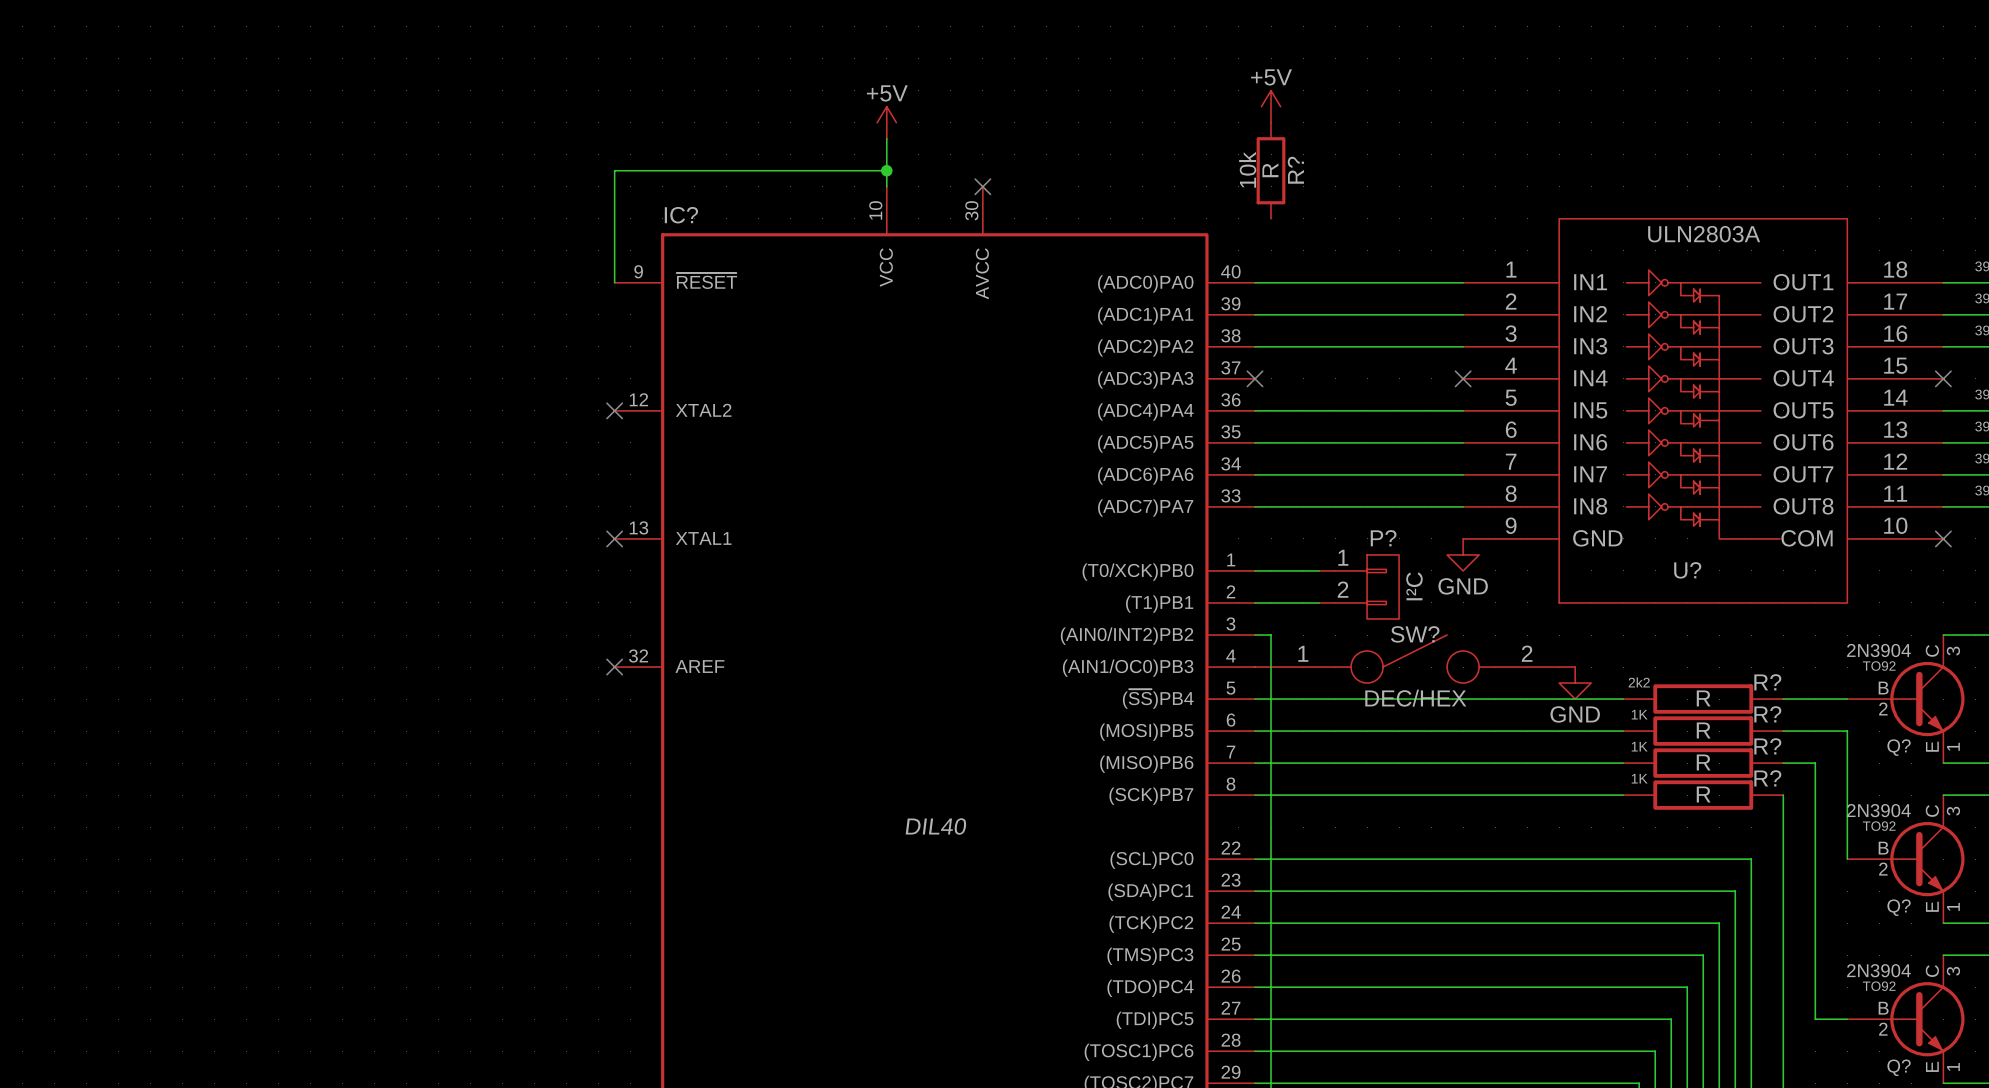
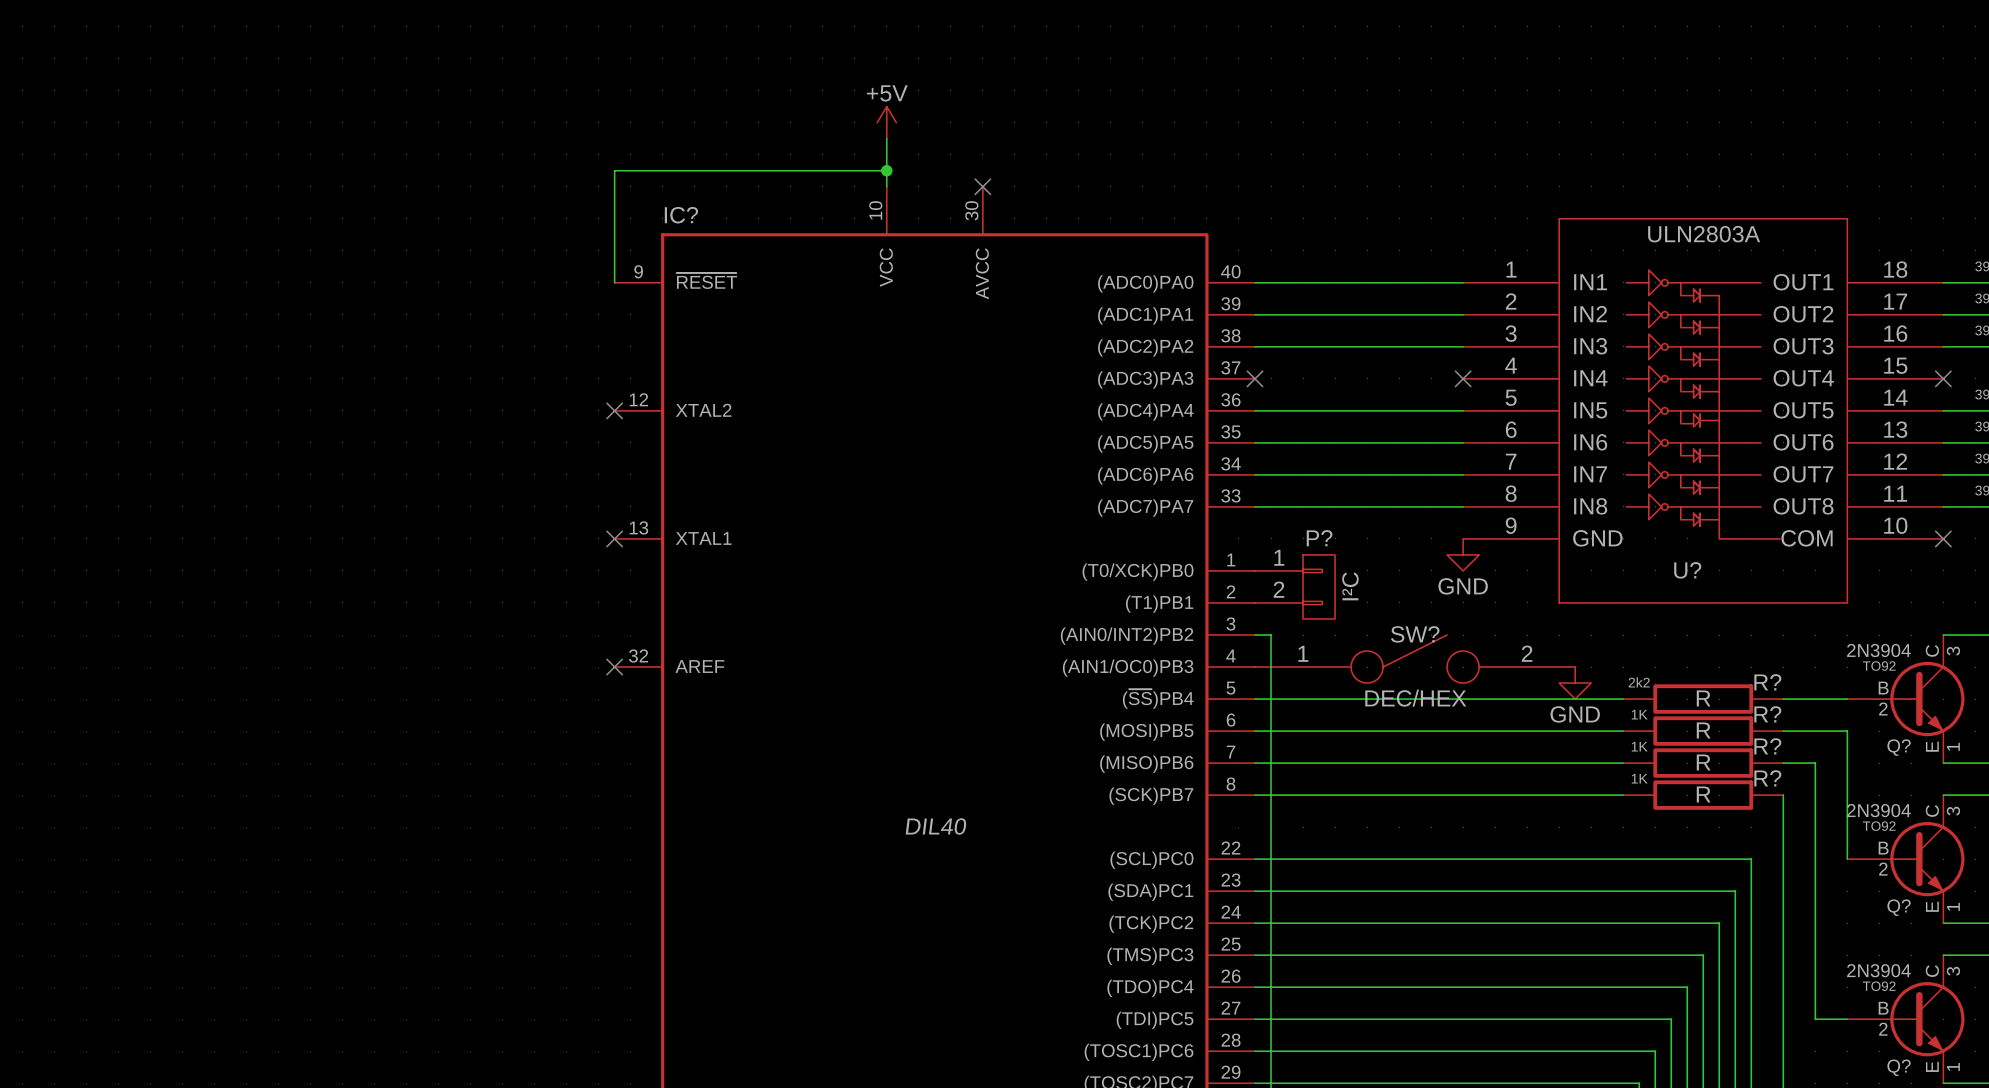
power symbol: +5V (1271, 106) -> none
R?: R (1271, 170) -> none
P? position: (1359, 586) -> (1295, 586)

